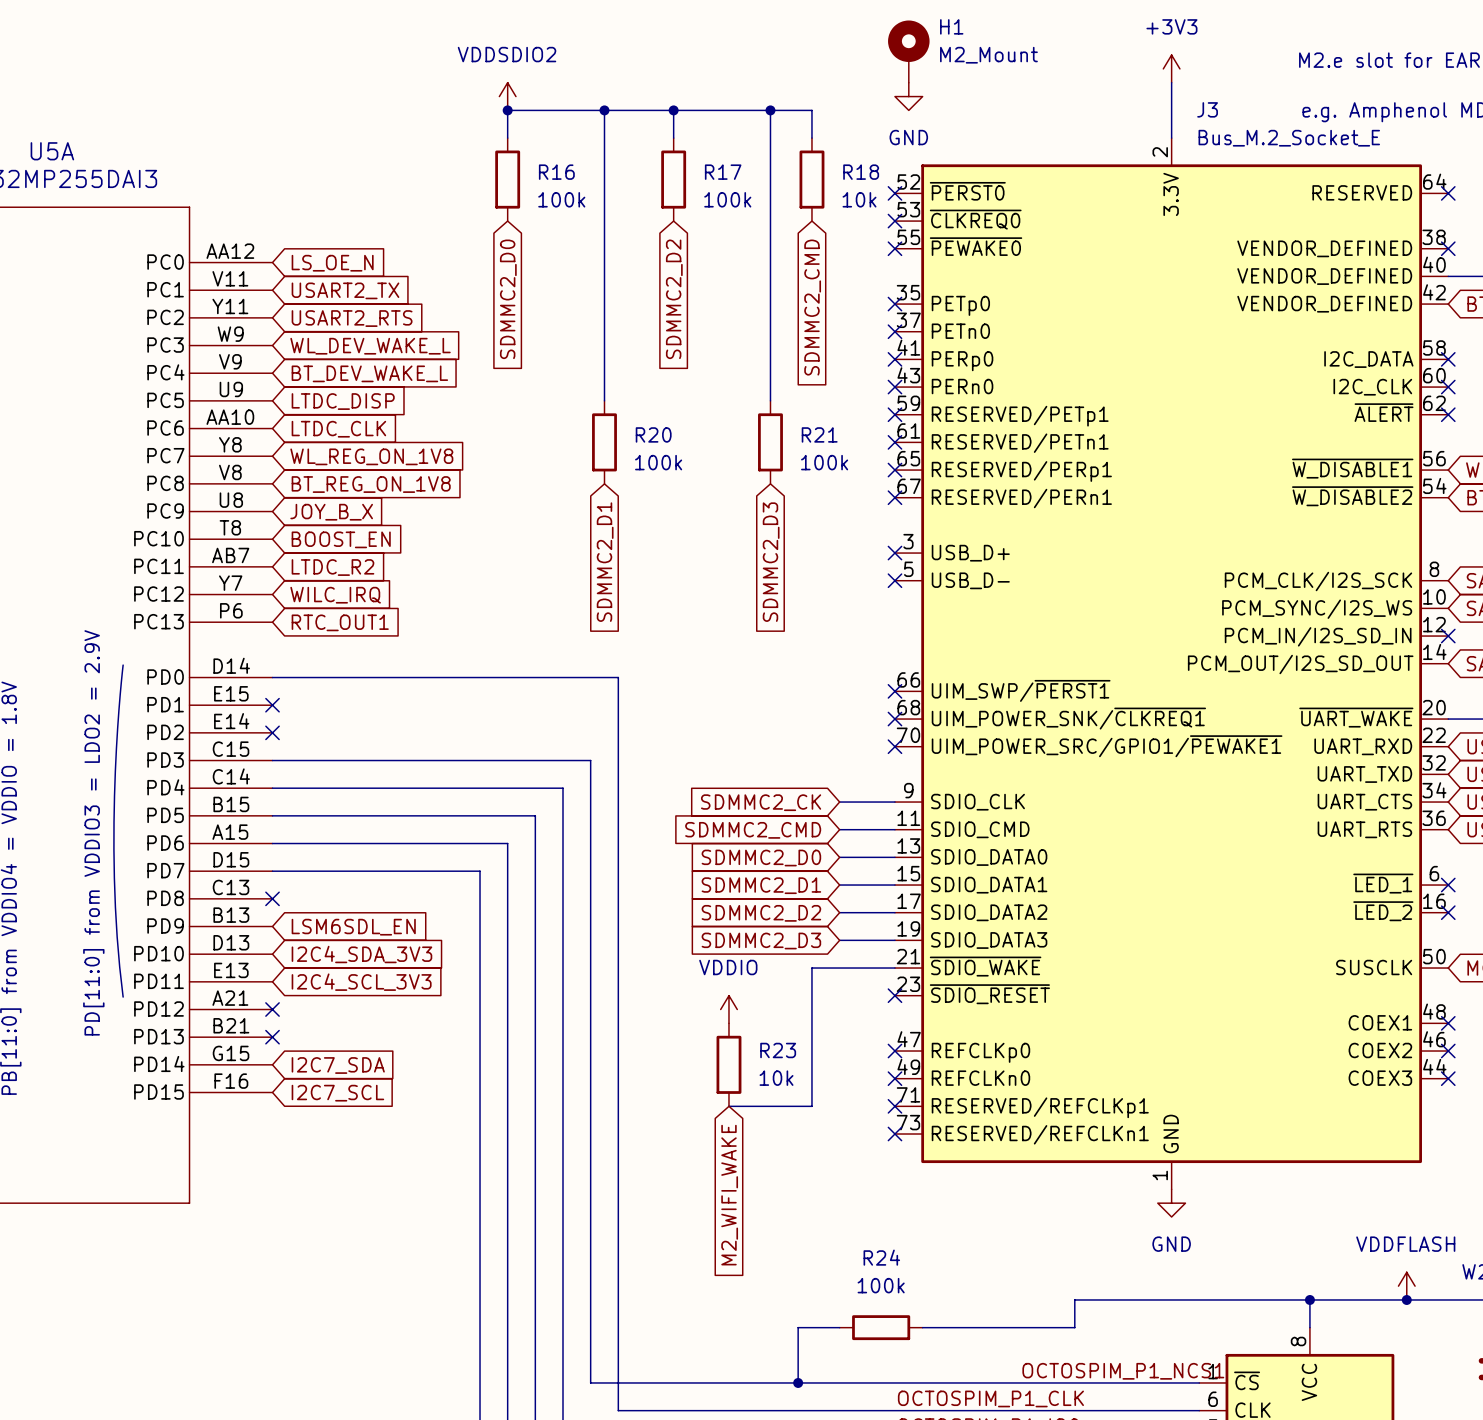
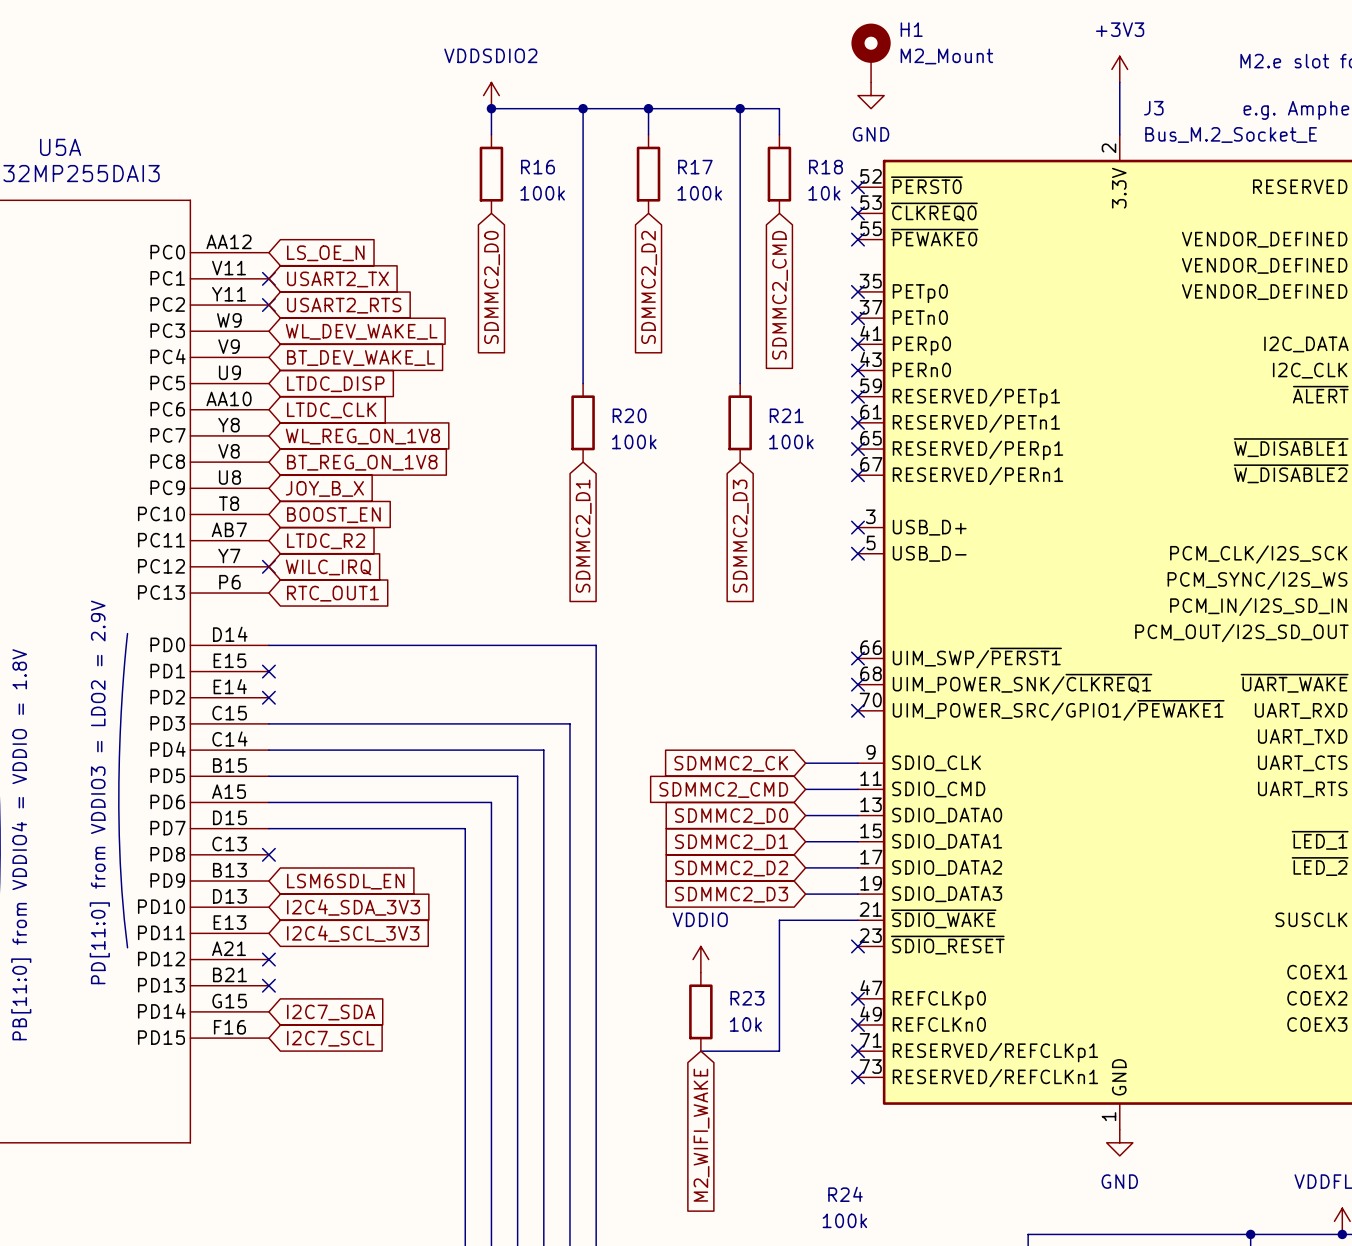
no-connect mark: none -> (268, 278)
no-connect mark: none -> (268, 305)
no-connect mark: none -> (268, 566)

